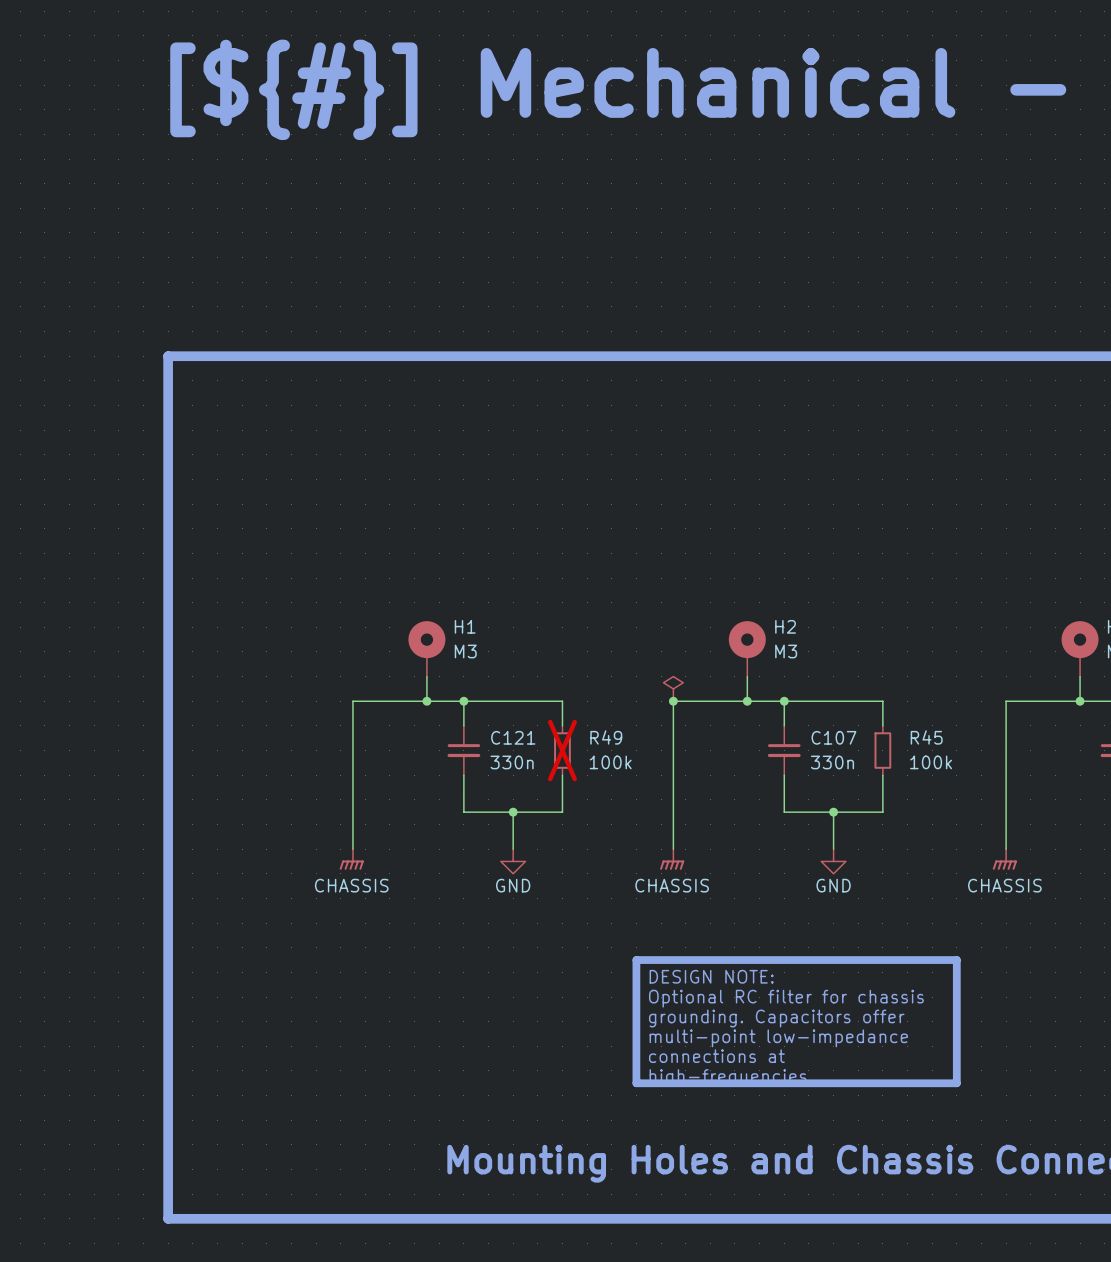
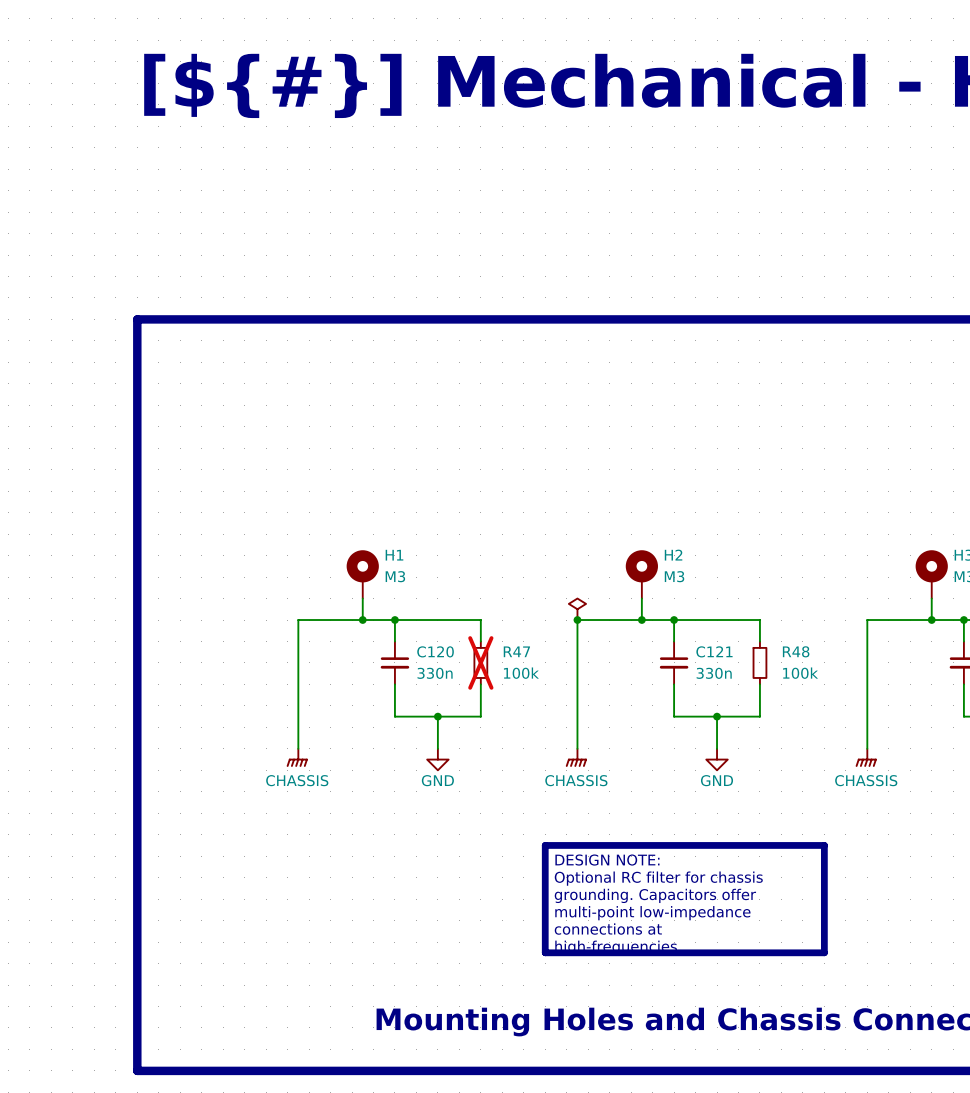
C121 name: C121 (513, 737) -> C120 (435, 651)
R49 name: R49 (606, 737) -> R47 (516, 651)
C107 name: C107 (833, 737) -> C121 (714, 651)
R45 name: R45 (926, 737) -> R48 (796, 651)

